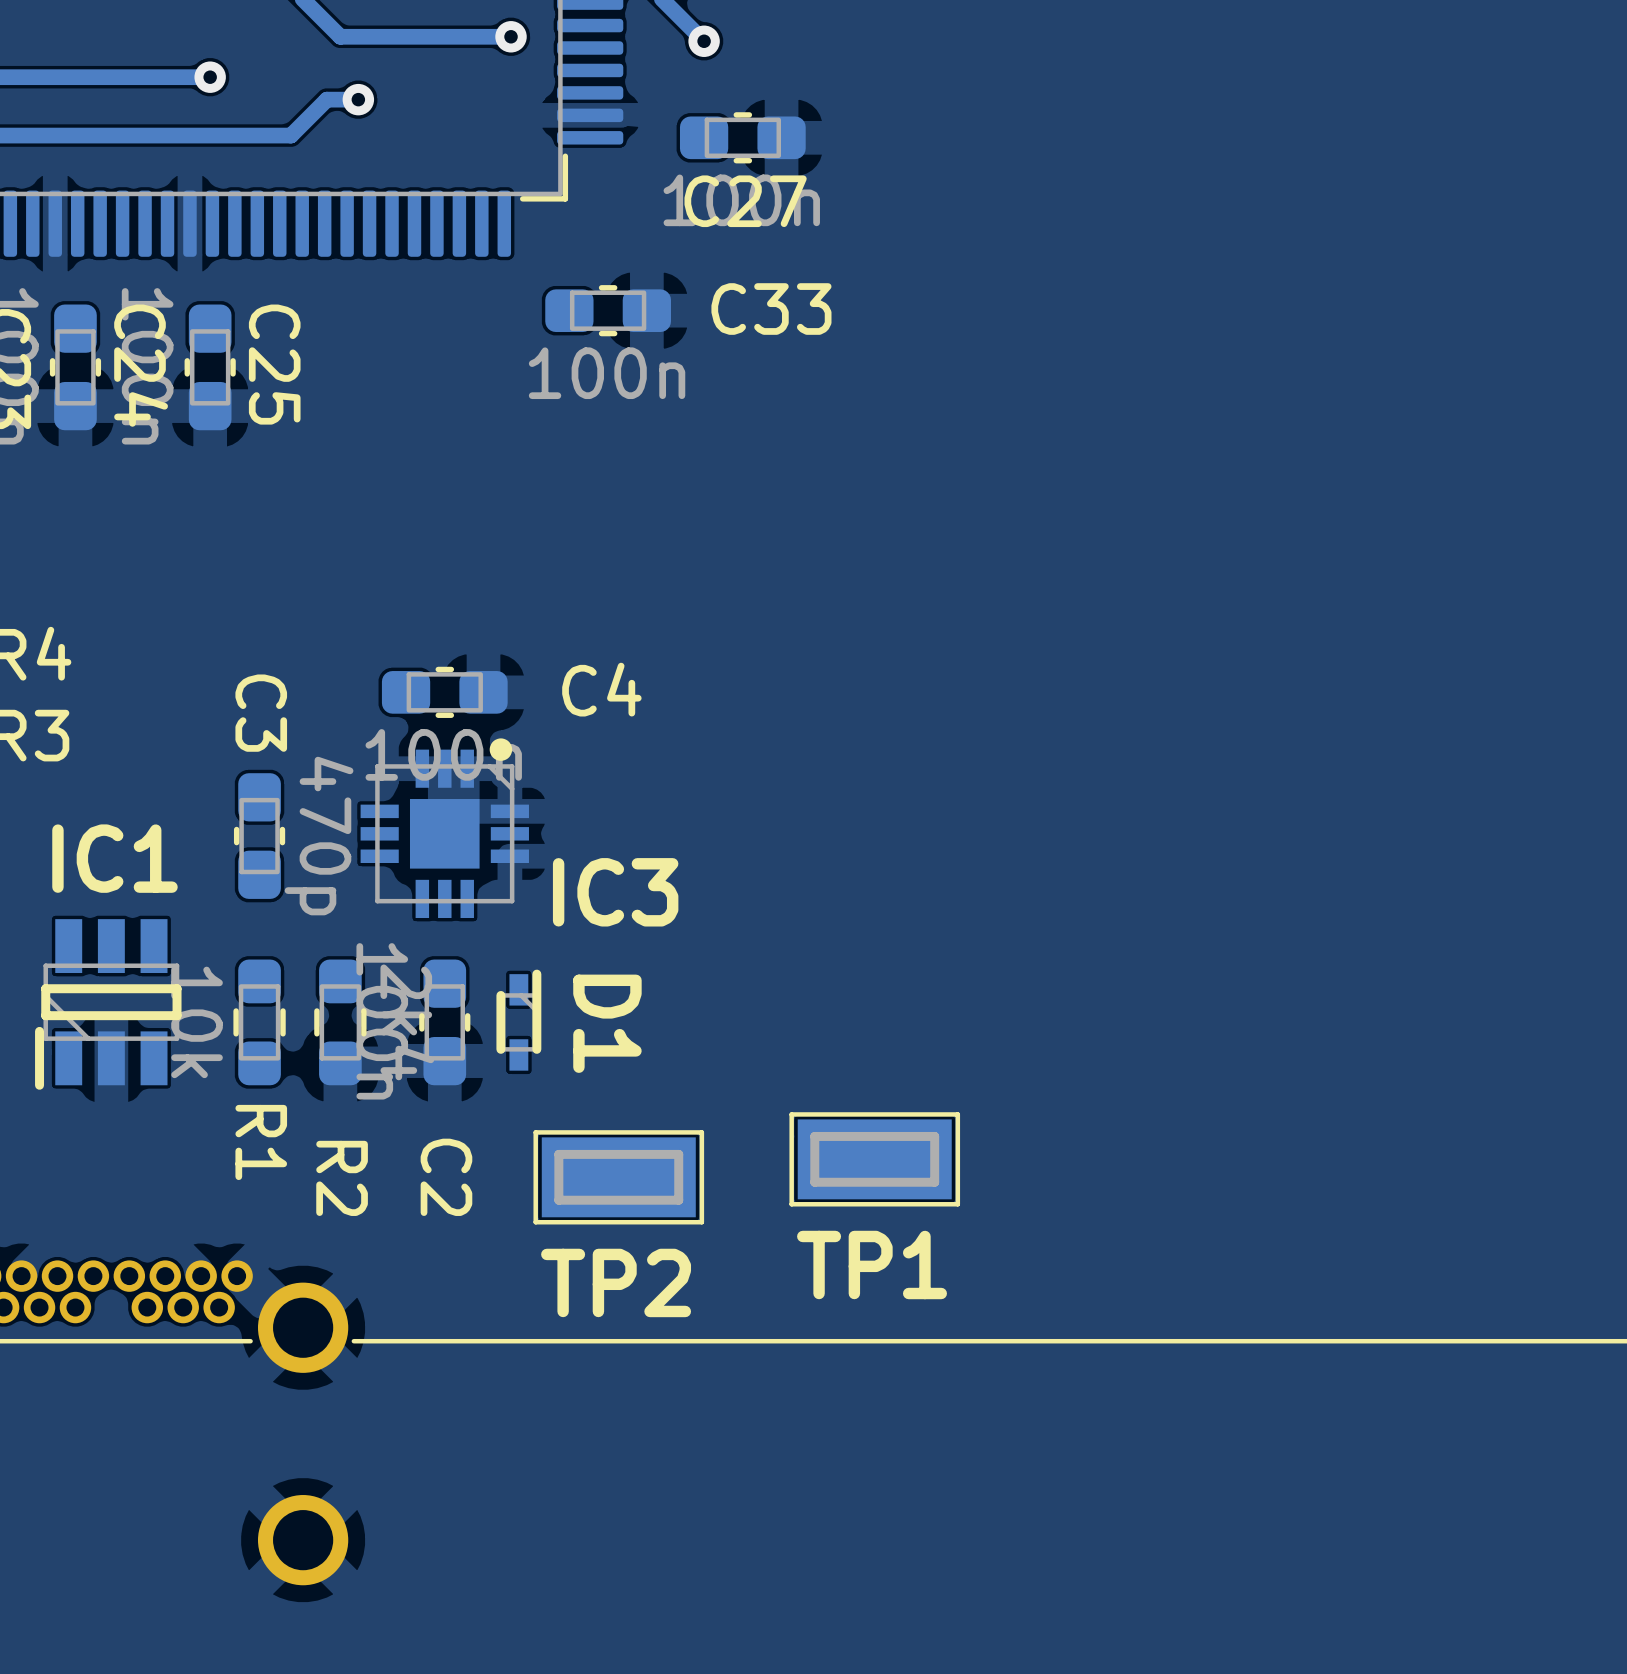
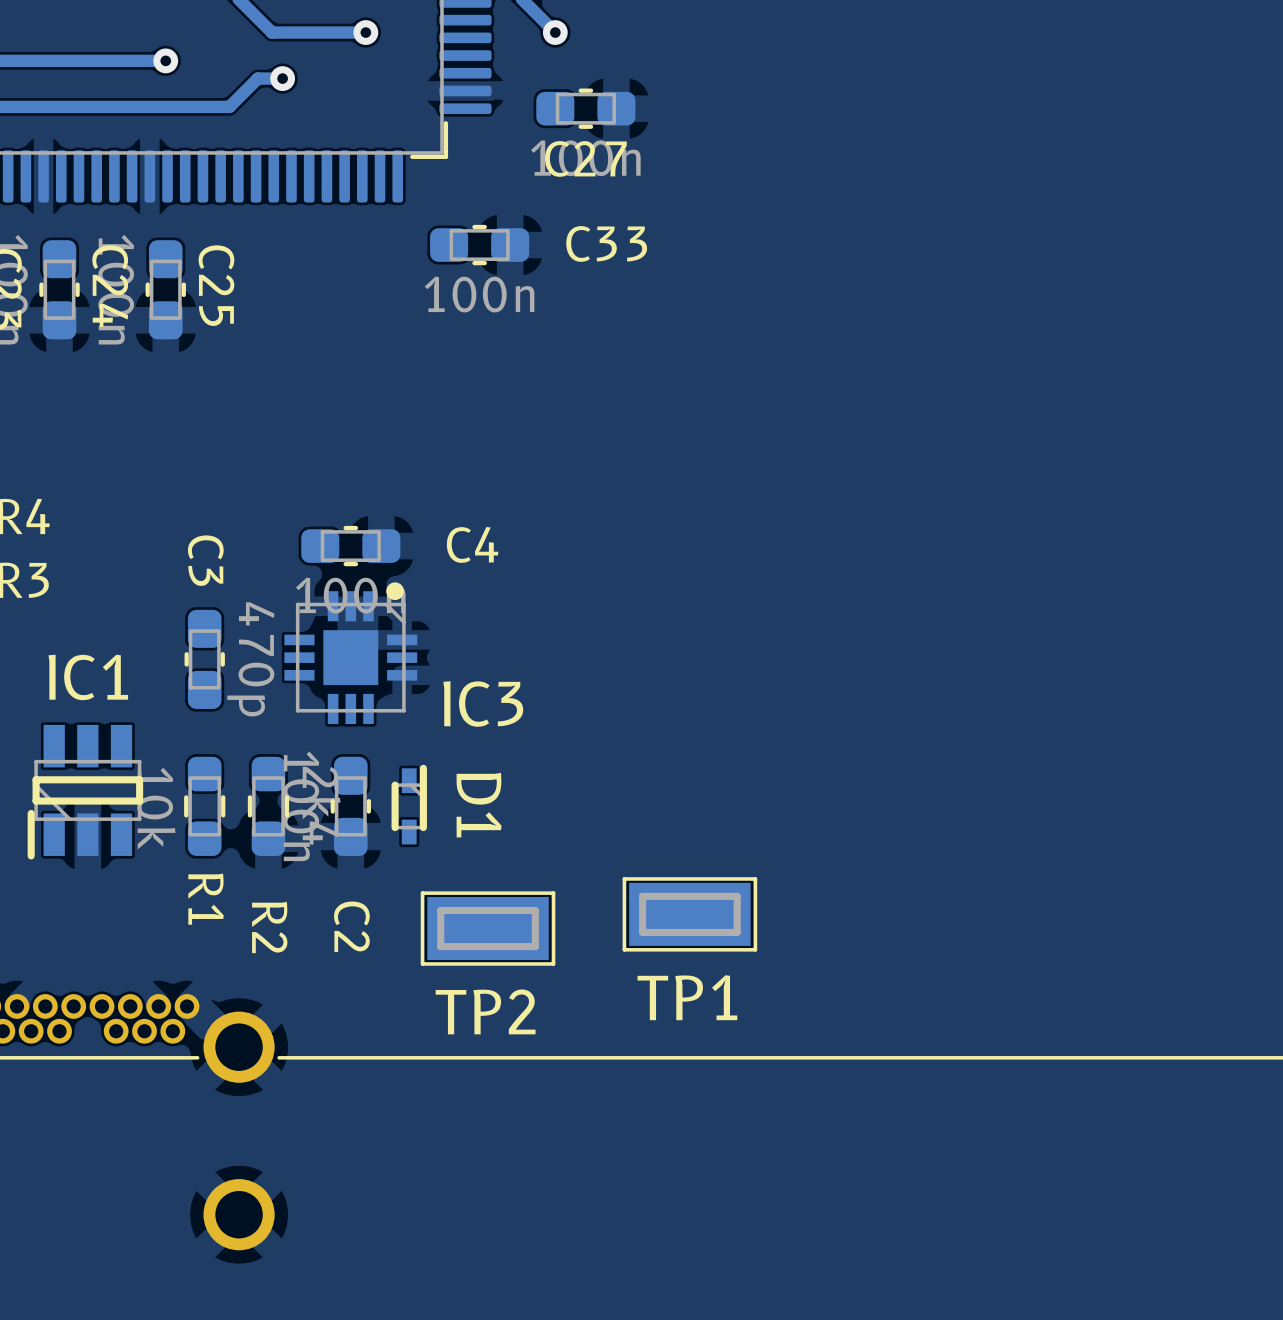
track: (511, 36) (340, 36) -> (365, 32) (272, 32) (268, 29)
via: (511, 36) -> none
via: none -> (365, 32)

